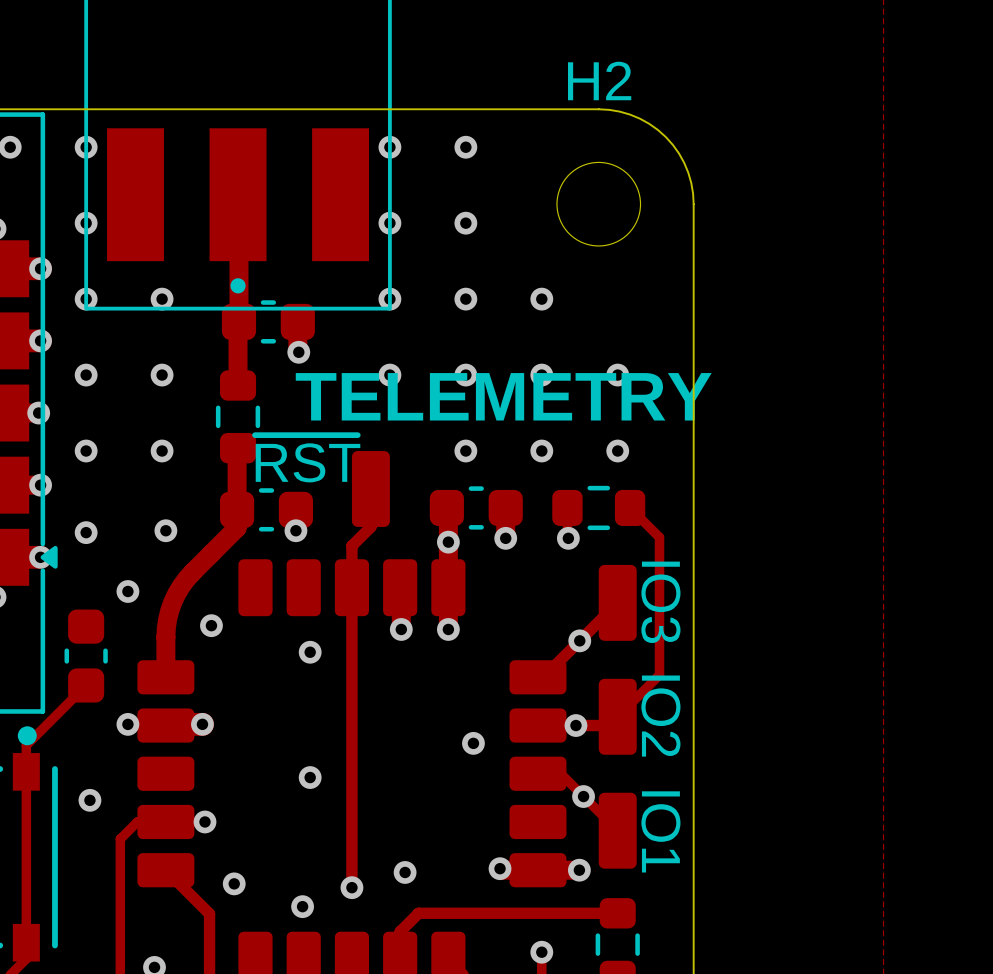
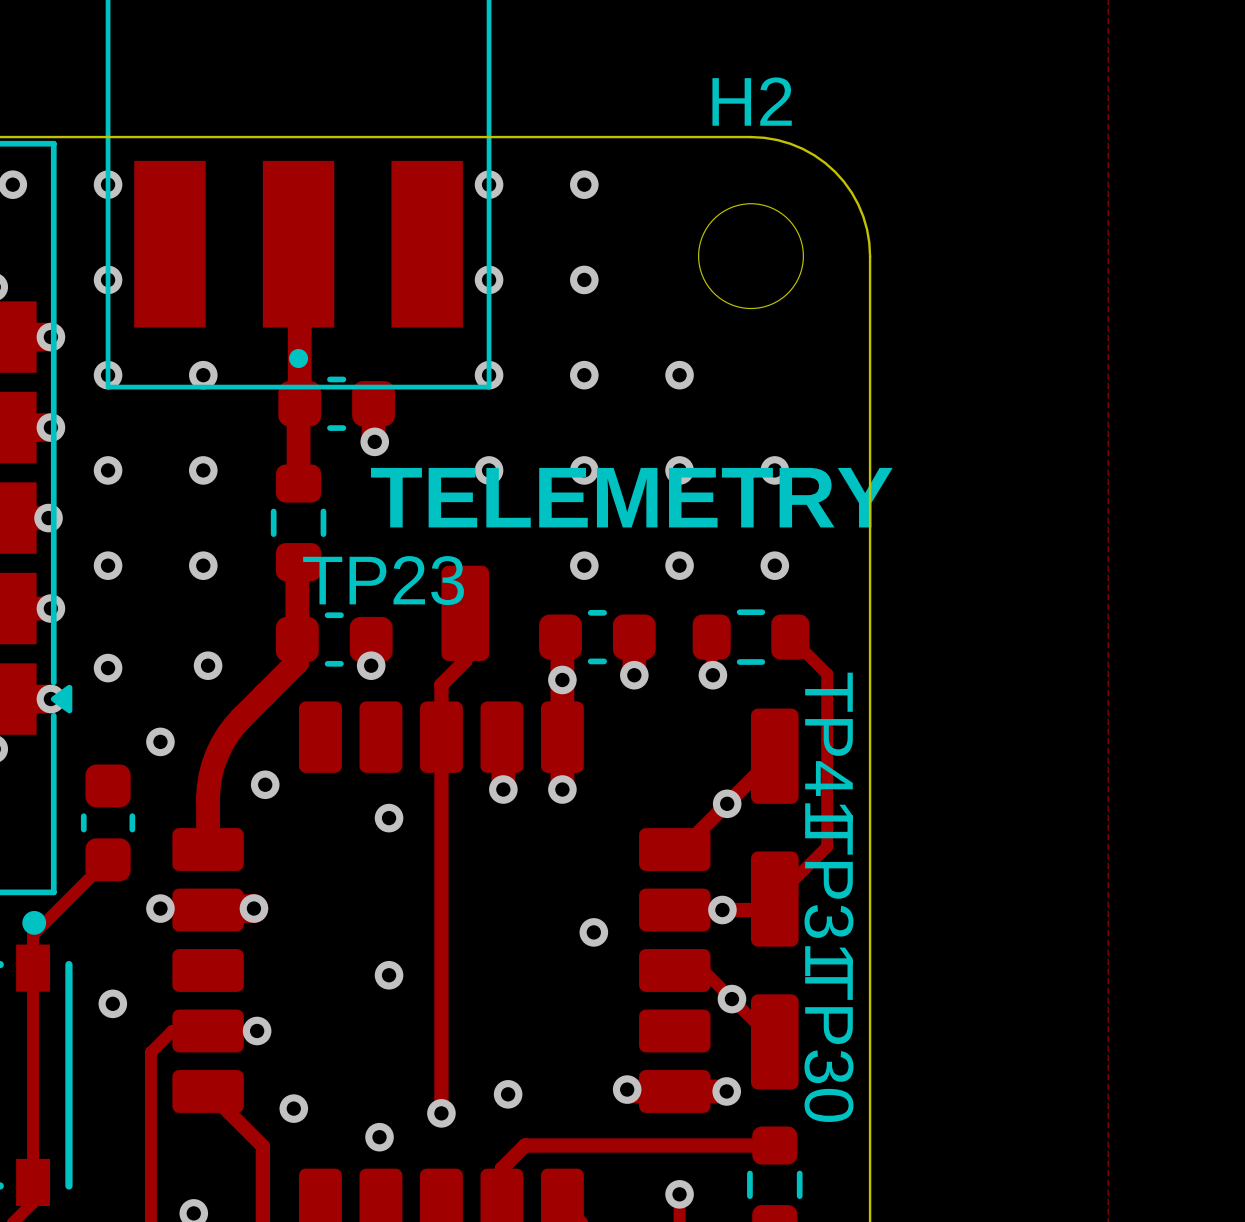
~{RST} name: ~{RST} (307, 458) -> TP23 (383, 580)
IO3 name: IO3 (660, 602) -> TP41 (828, 752)
IO2 name: IO2 (660, 716) -> TP31 (829, 895)
IO1 name: IO1 (660, 831) -> TP30 (829, 1041)

